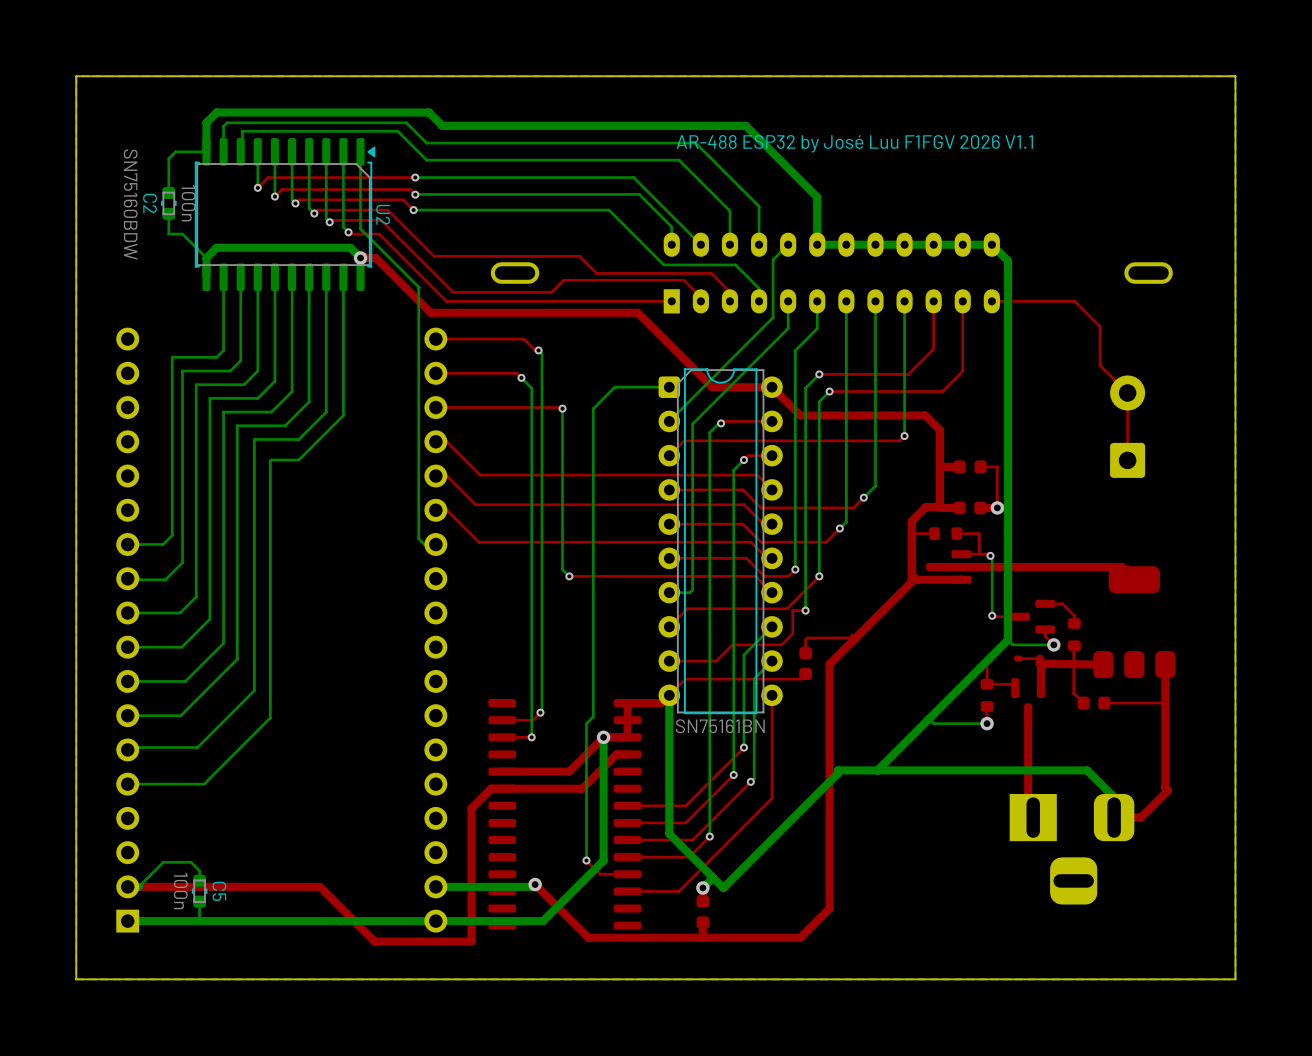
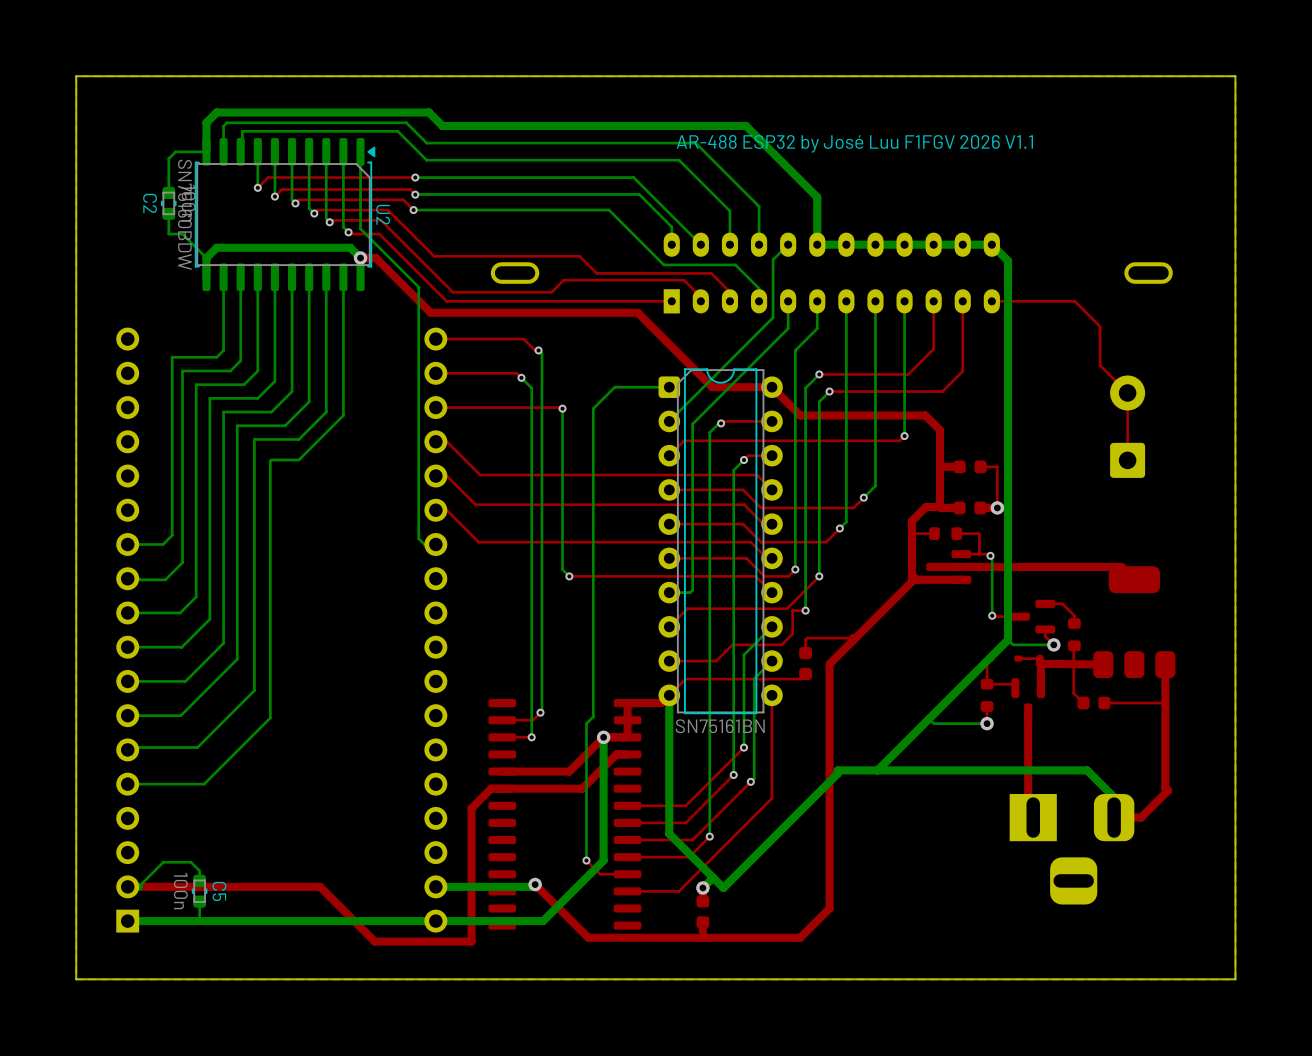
U2 value position: SN75160BDW (130, 204) -> SN75160BDW (184, 214)

